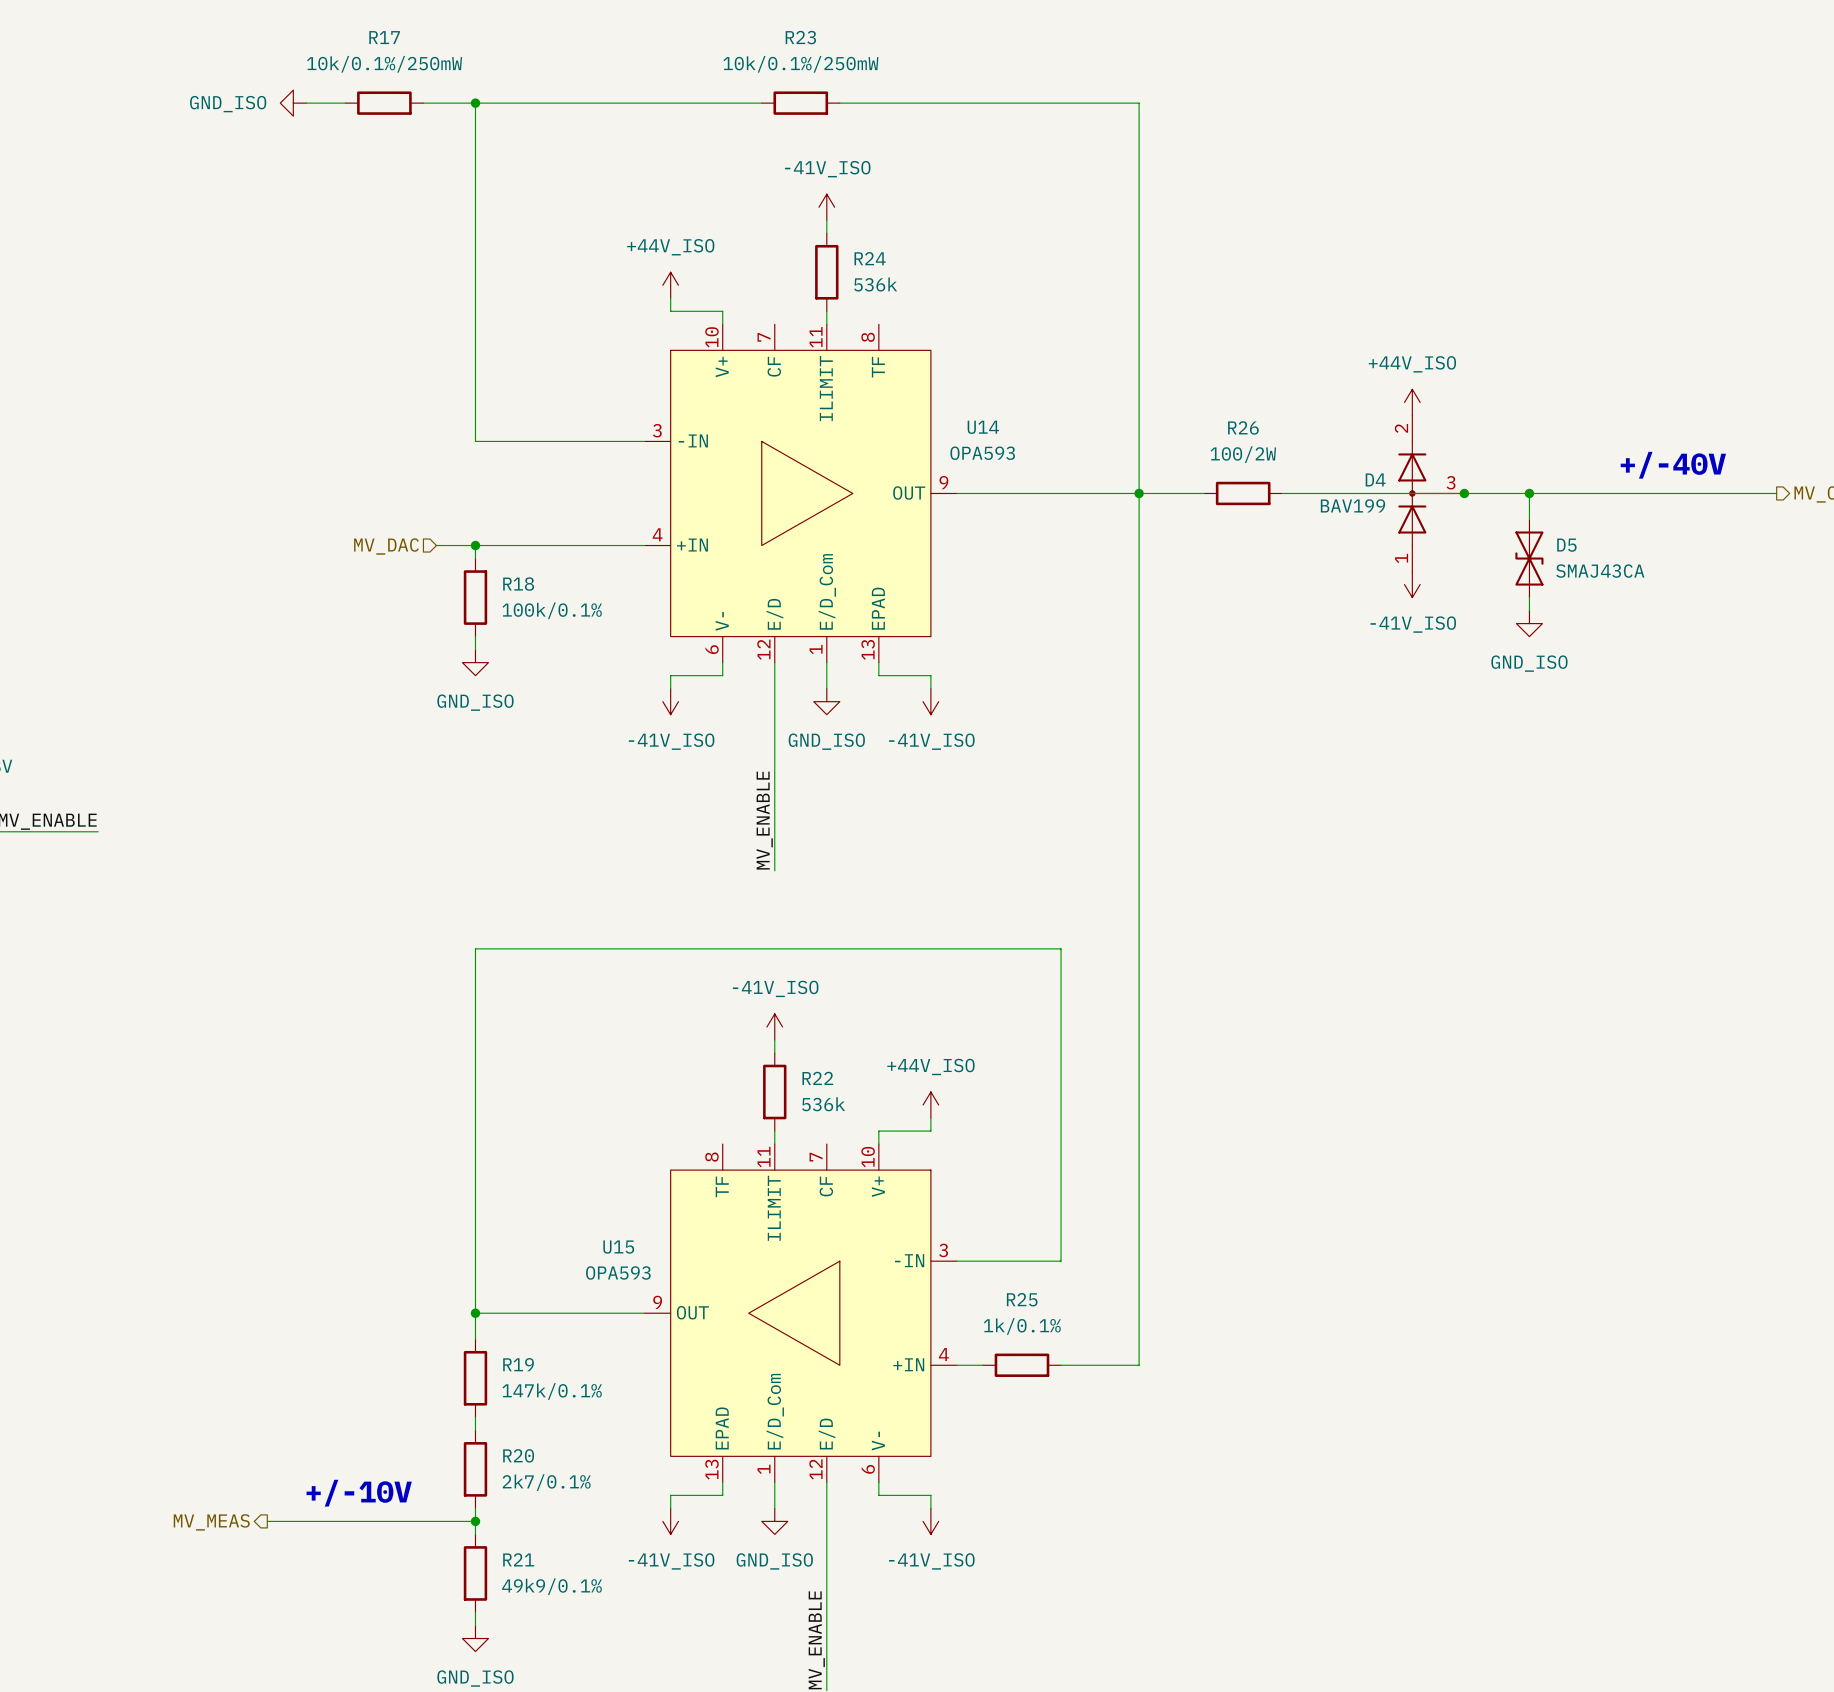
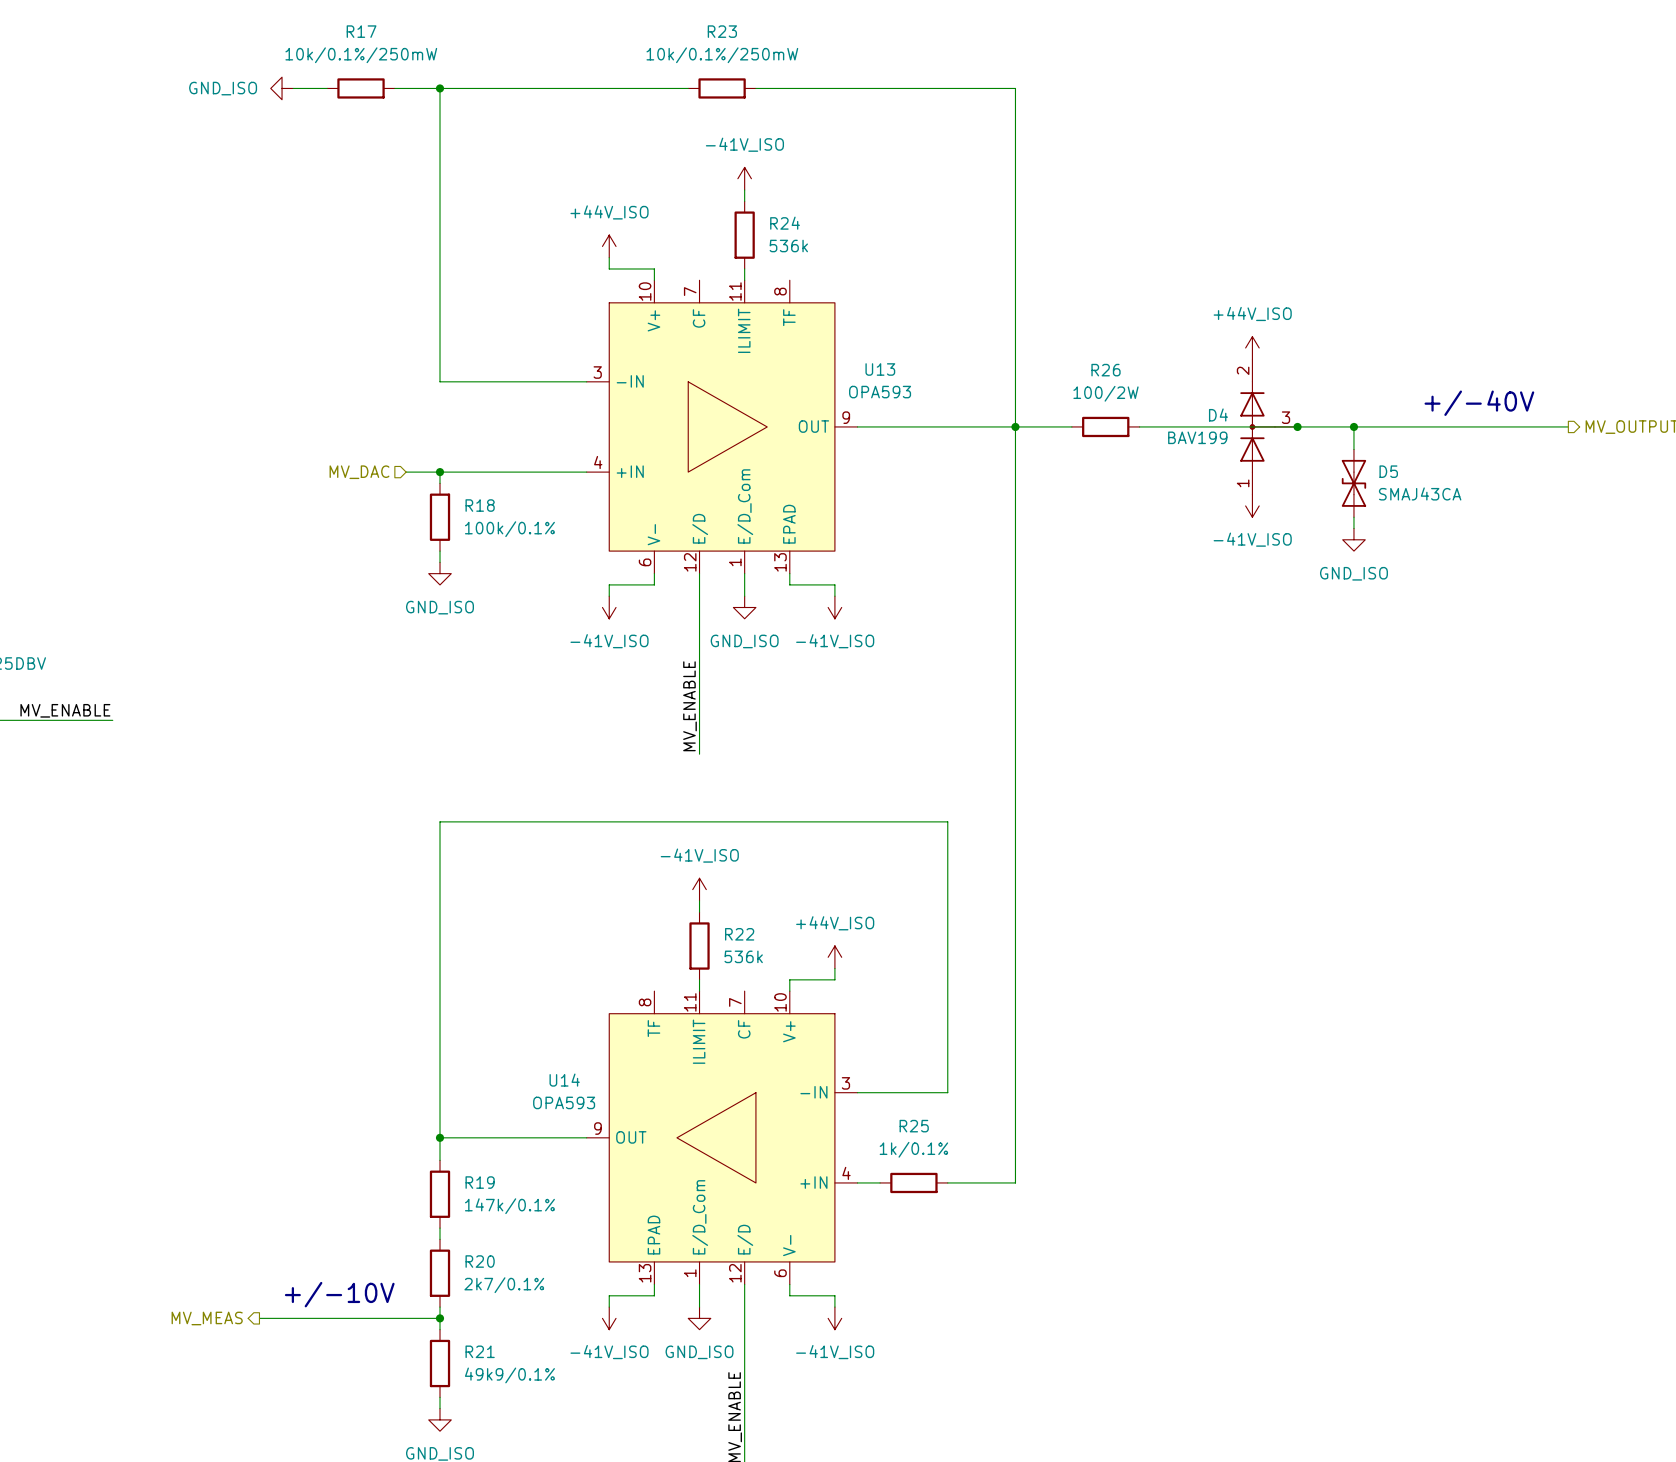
U14 name: U14 (983, 427) -> U13 (880, 369)
U15 name: U15 (618, 1247) -> U14 (564, 1080)

